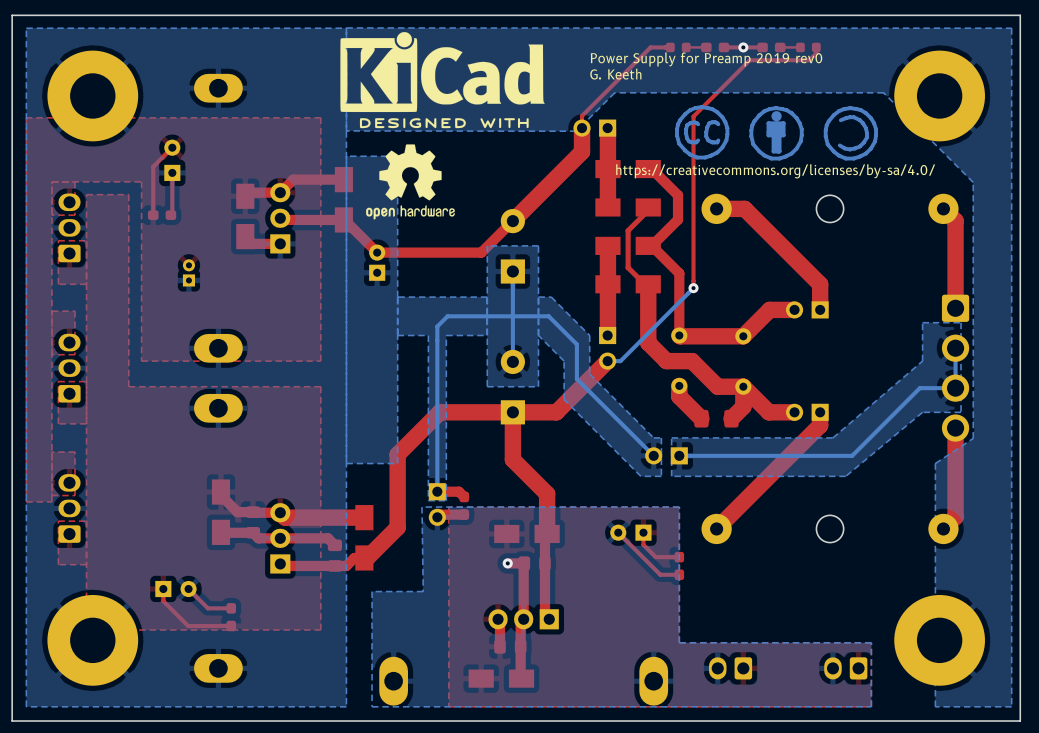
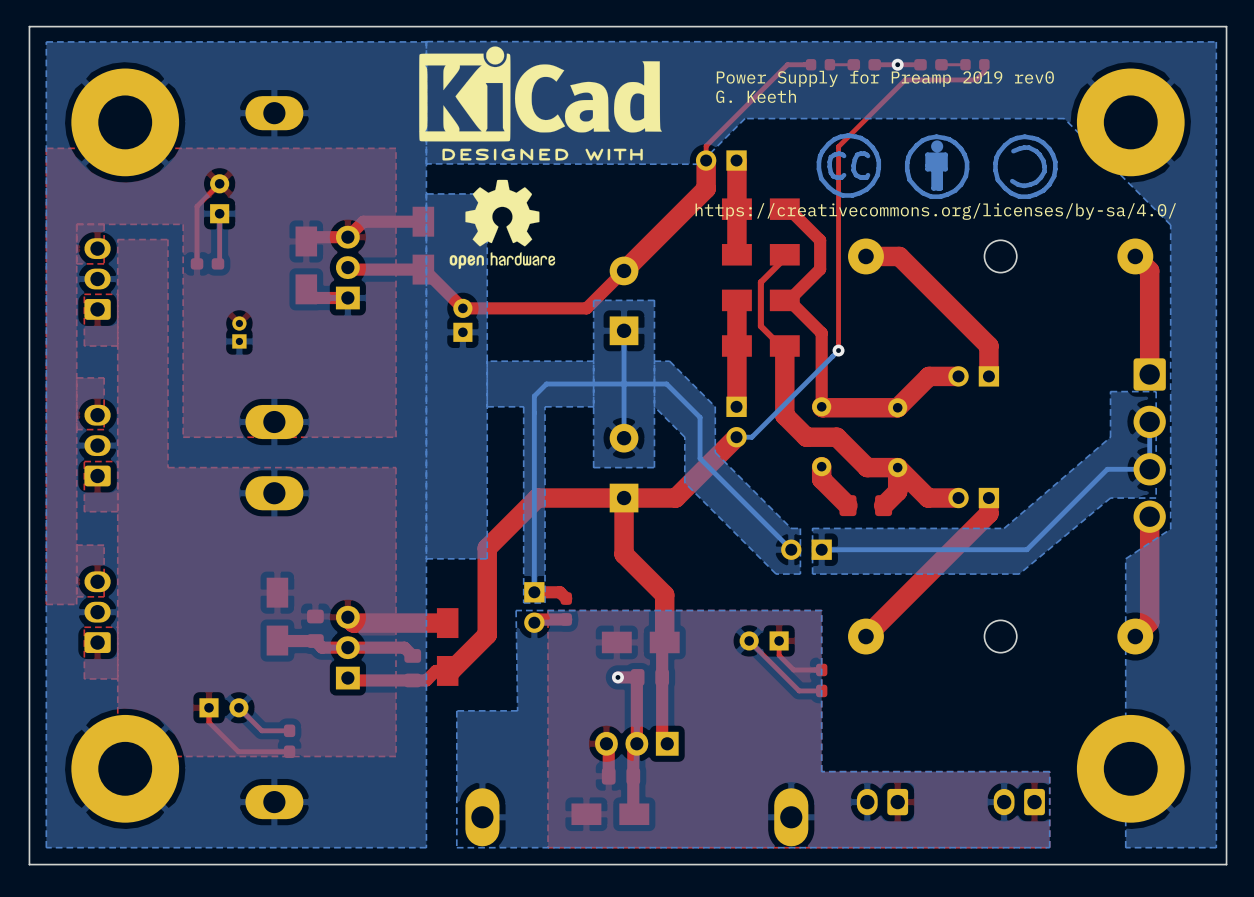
top track: (220, 492) (220, 495) (237, 512) (280, 512) -> none

